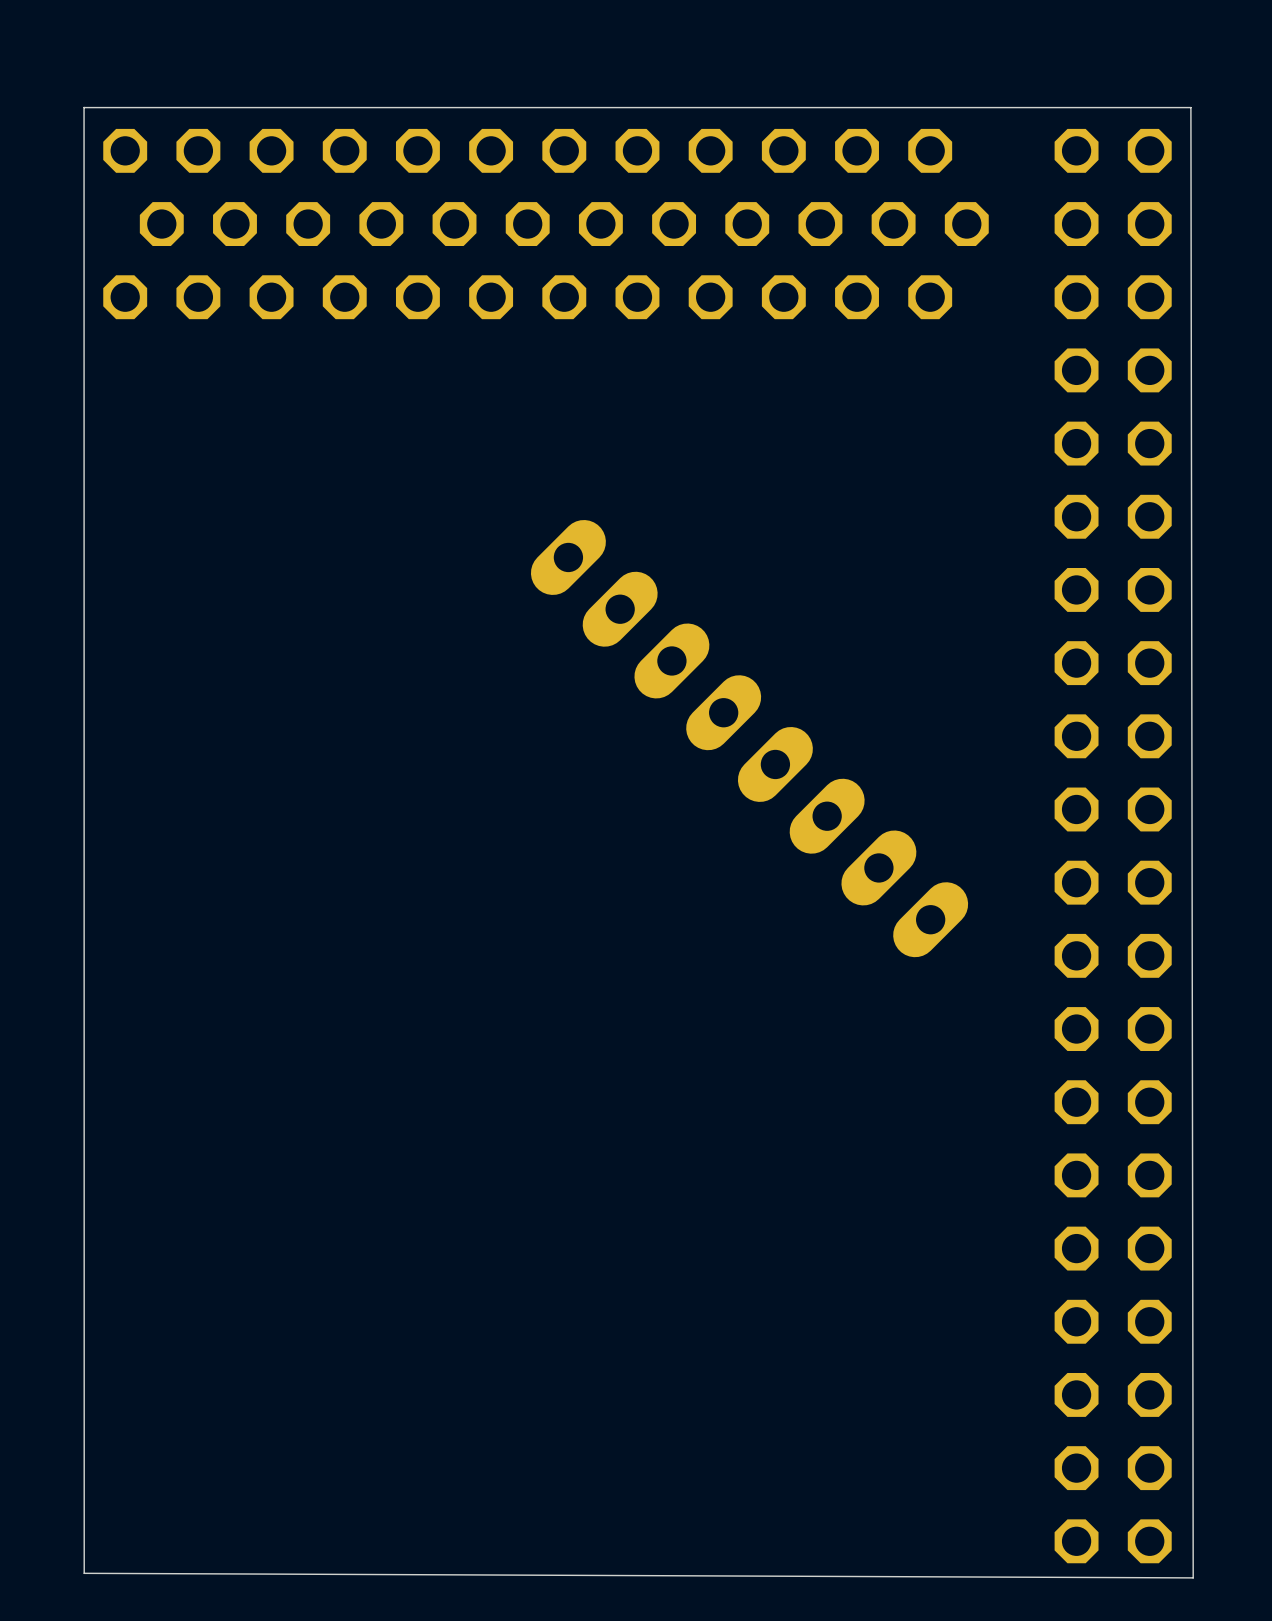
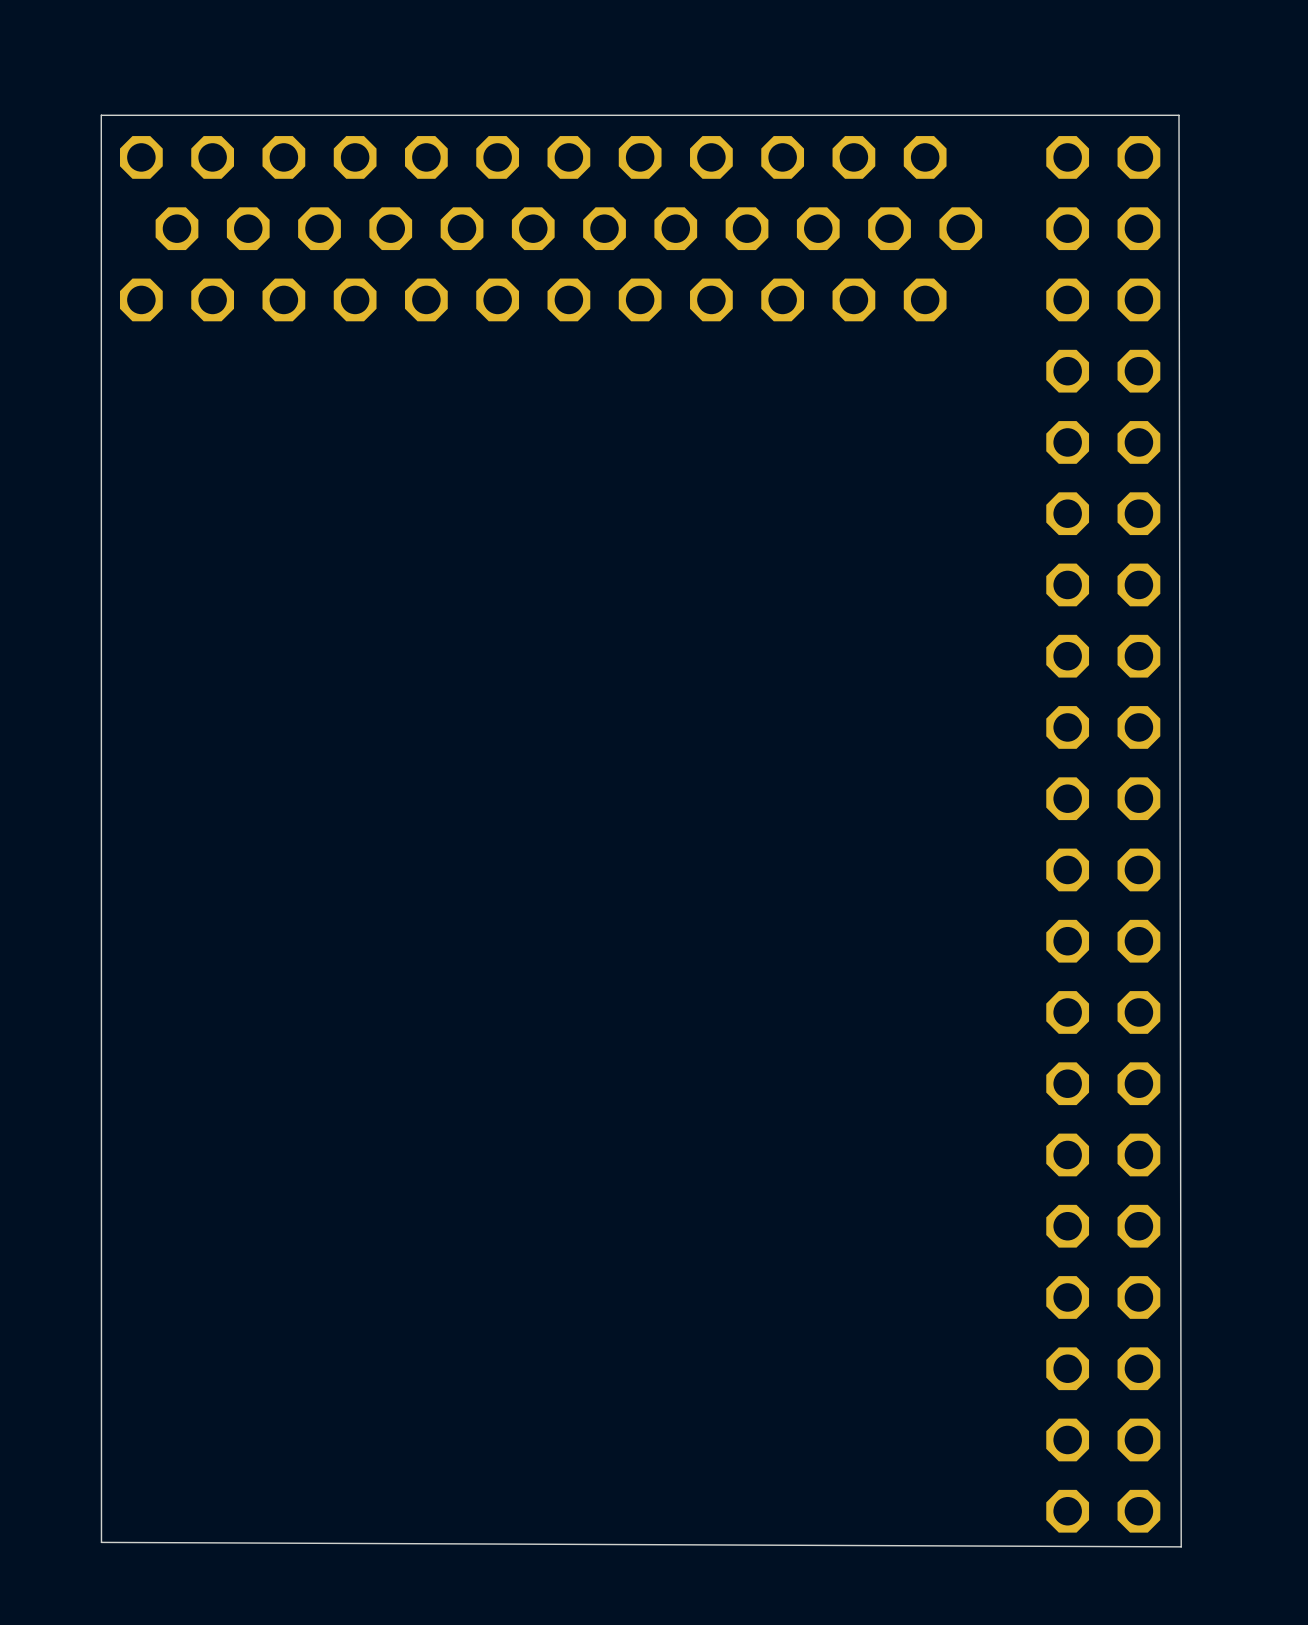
part: (749, 738) -> none

